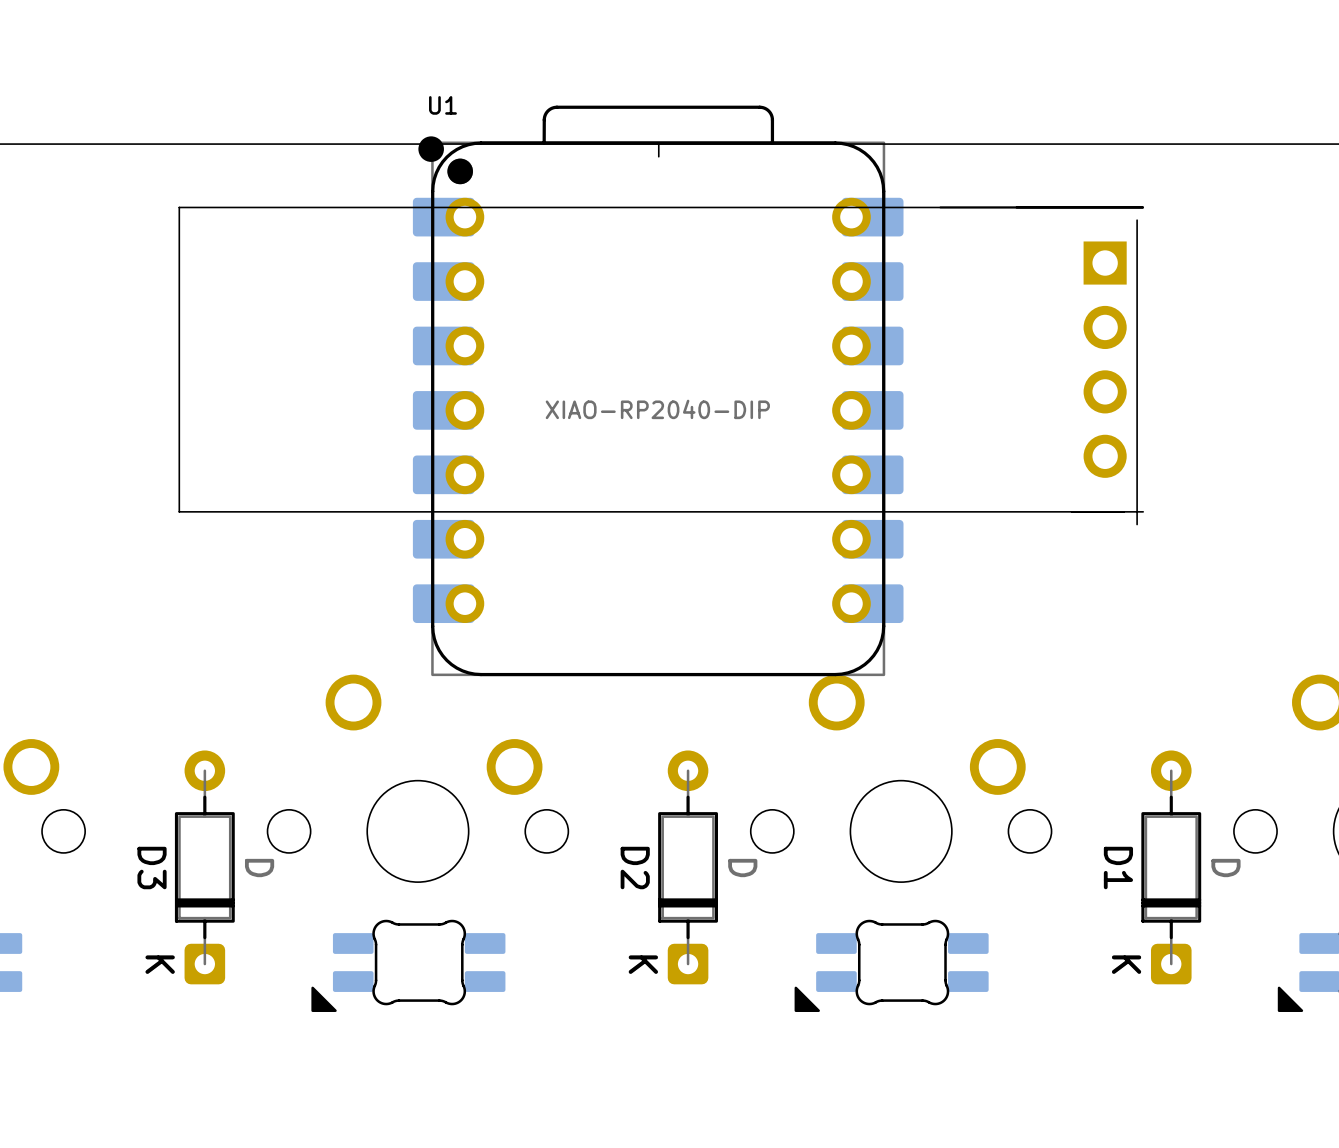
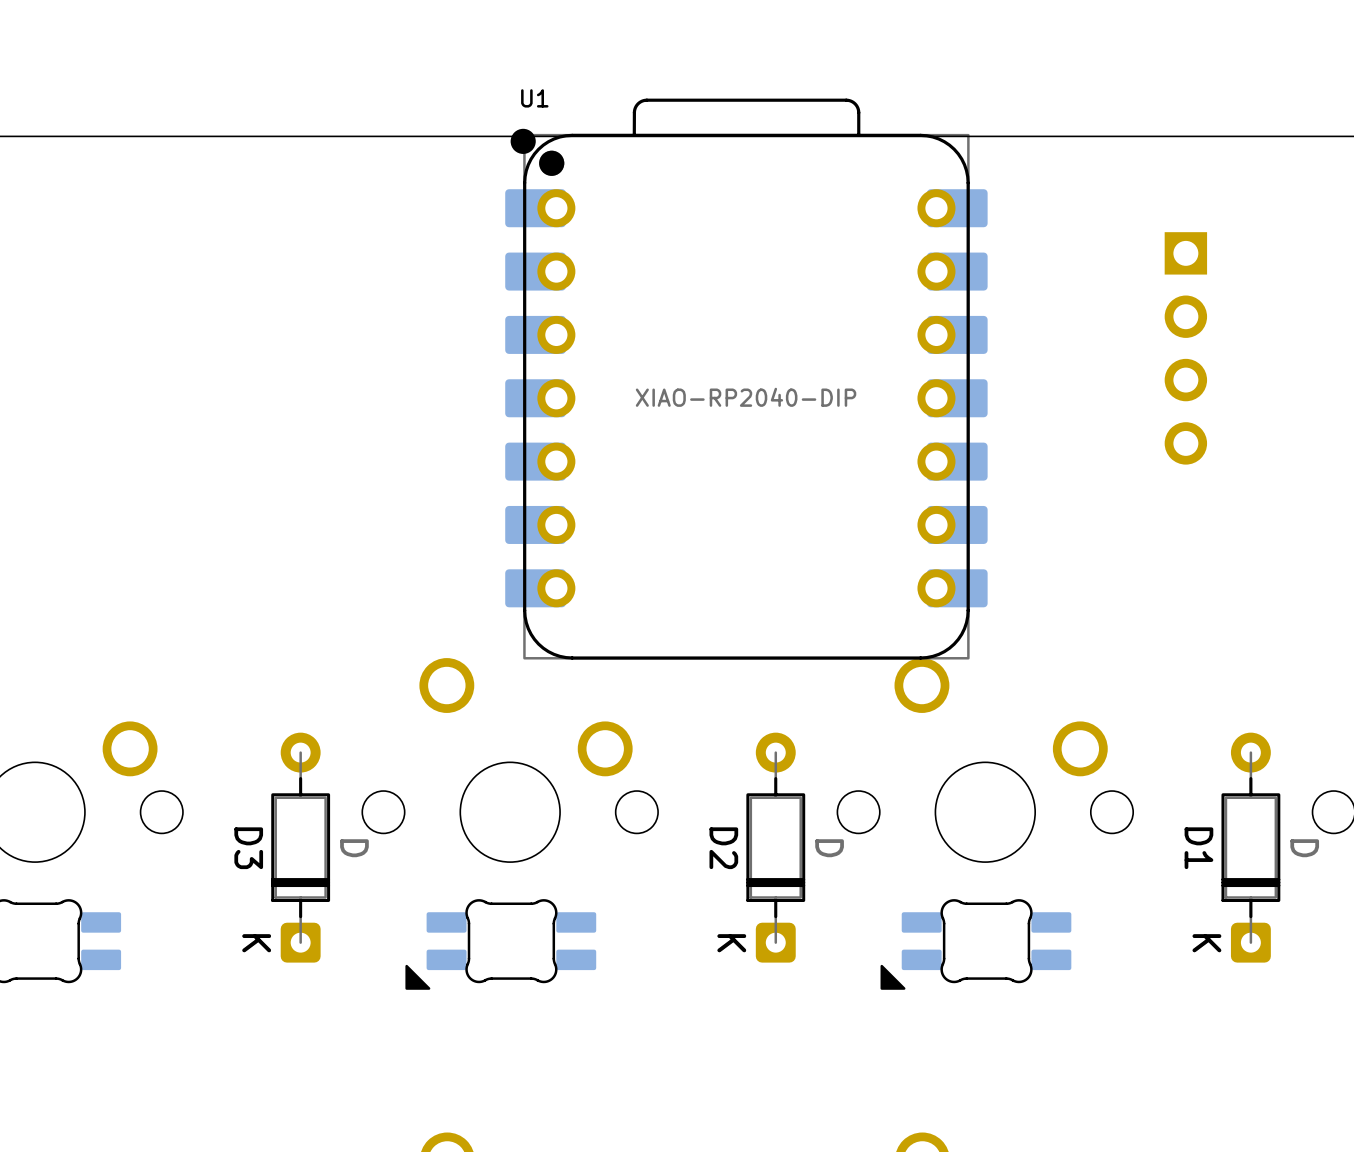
board edge: (658, 144) (658, 156) -> none
part: (661, 366) -> none

